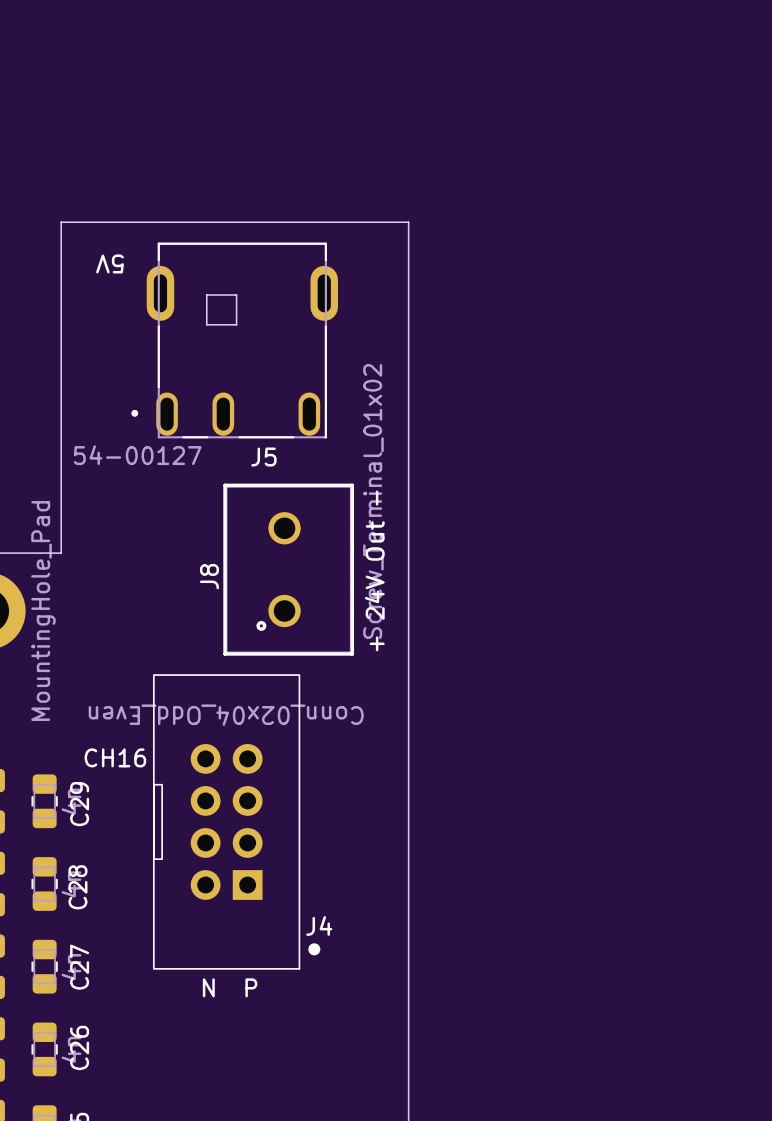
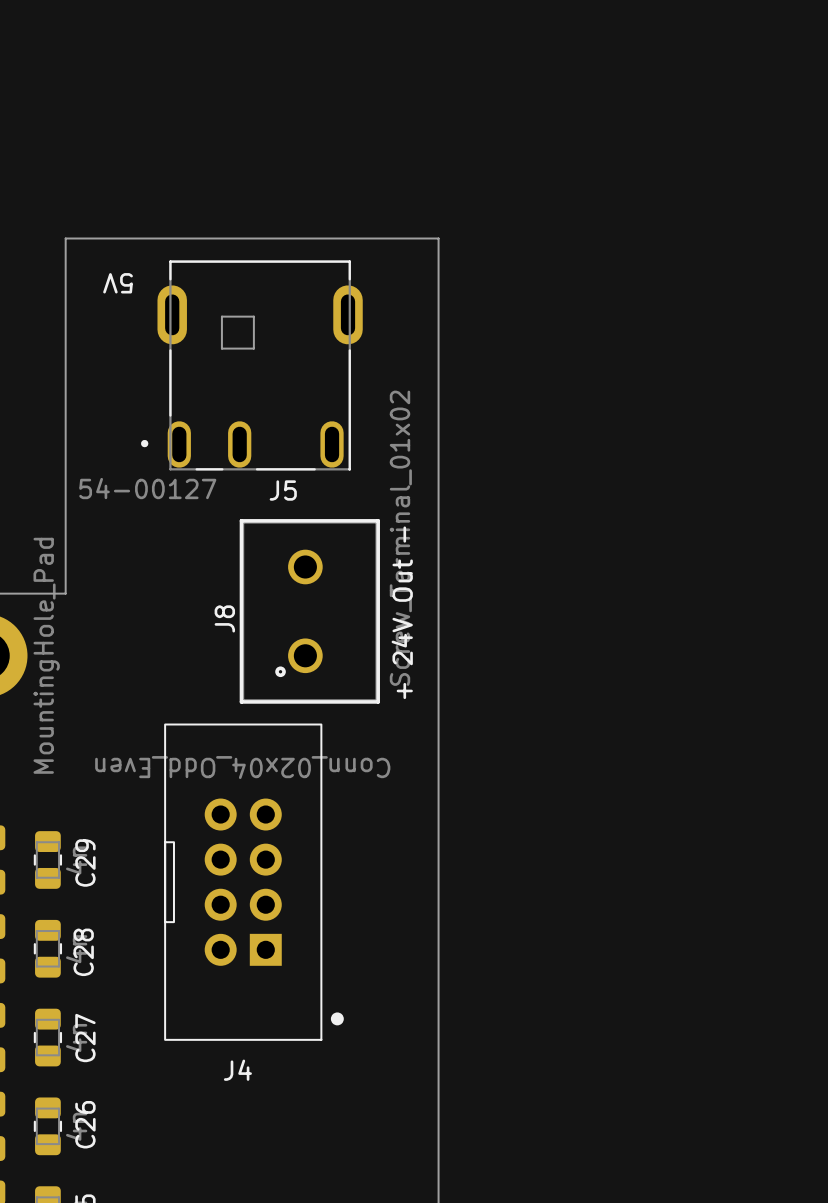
text: CH16 (115, 757) -> none
J4 name position: J4 (319, 926) -> J4 (237, 1070)
text: N P (230, 987) -> none

